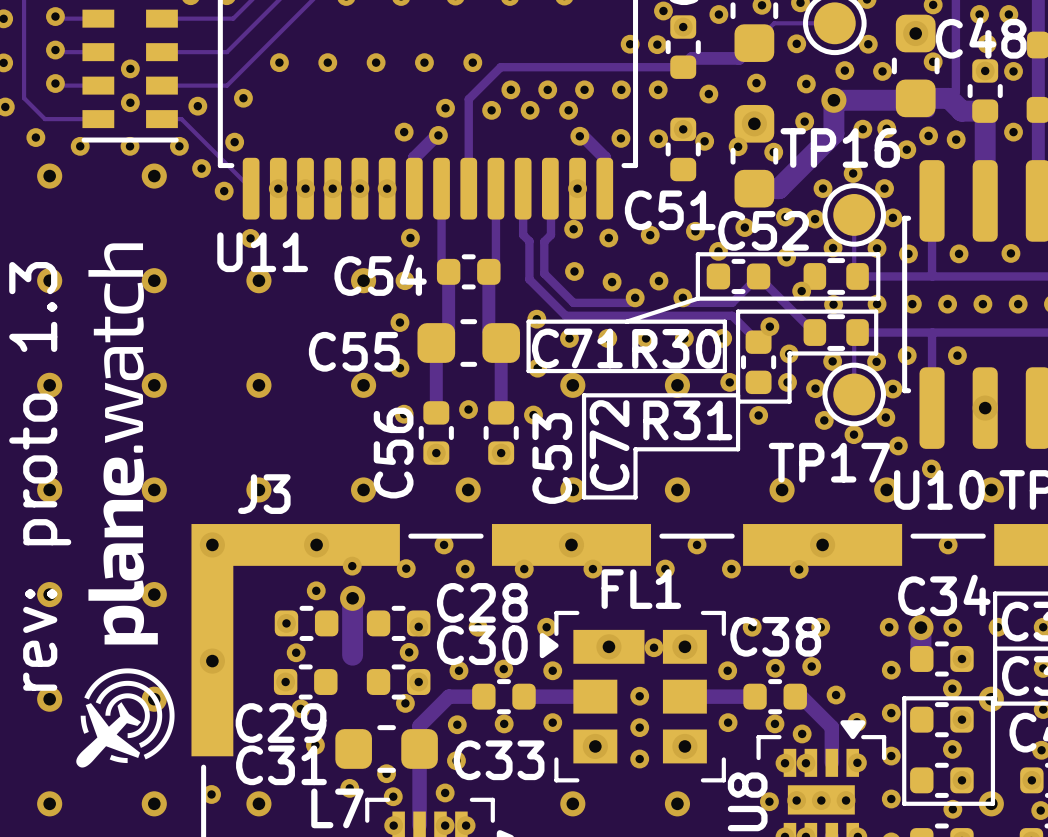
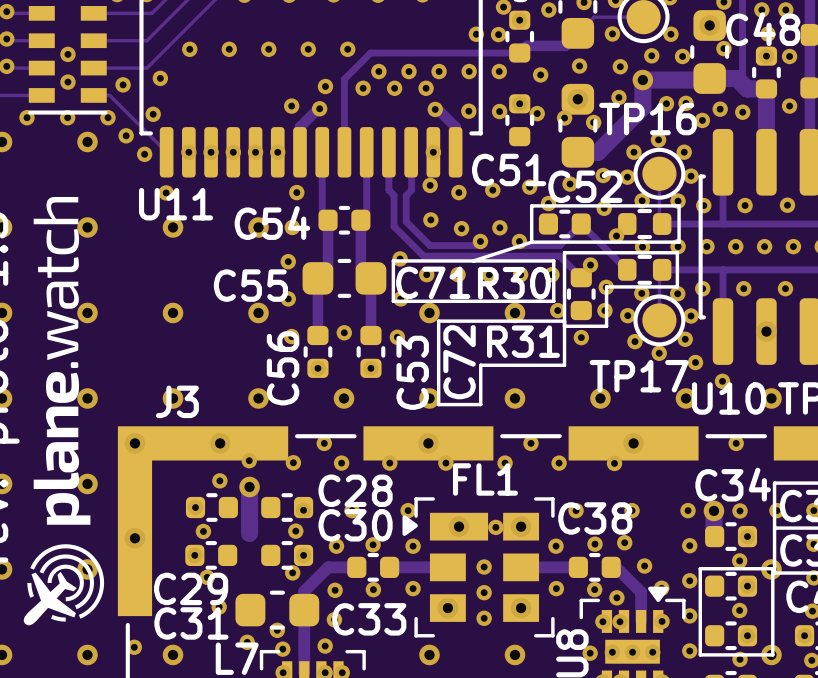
via: none -> (785, 288)

